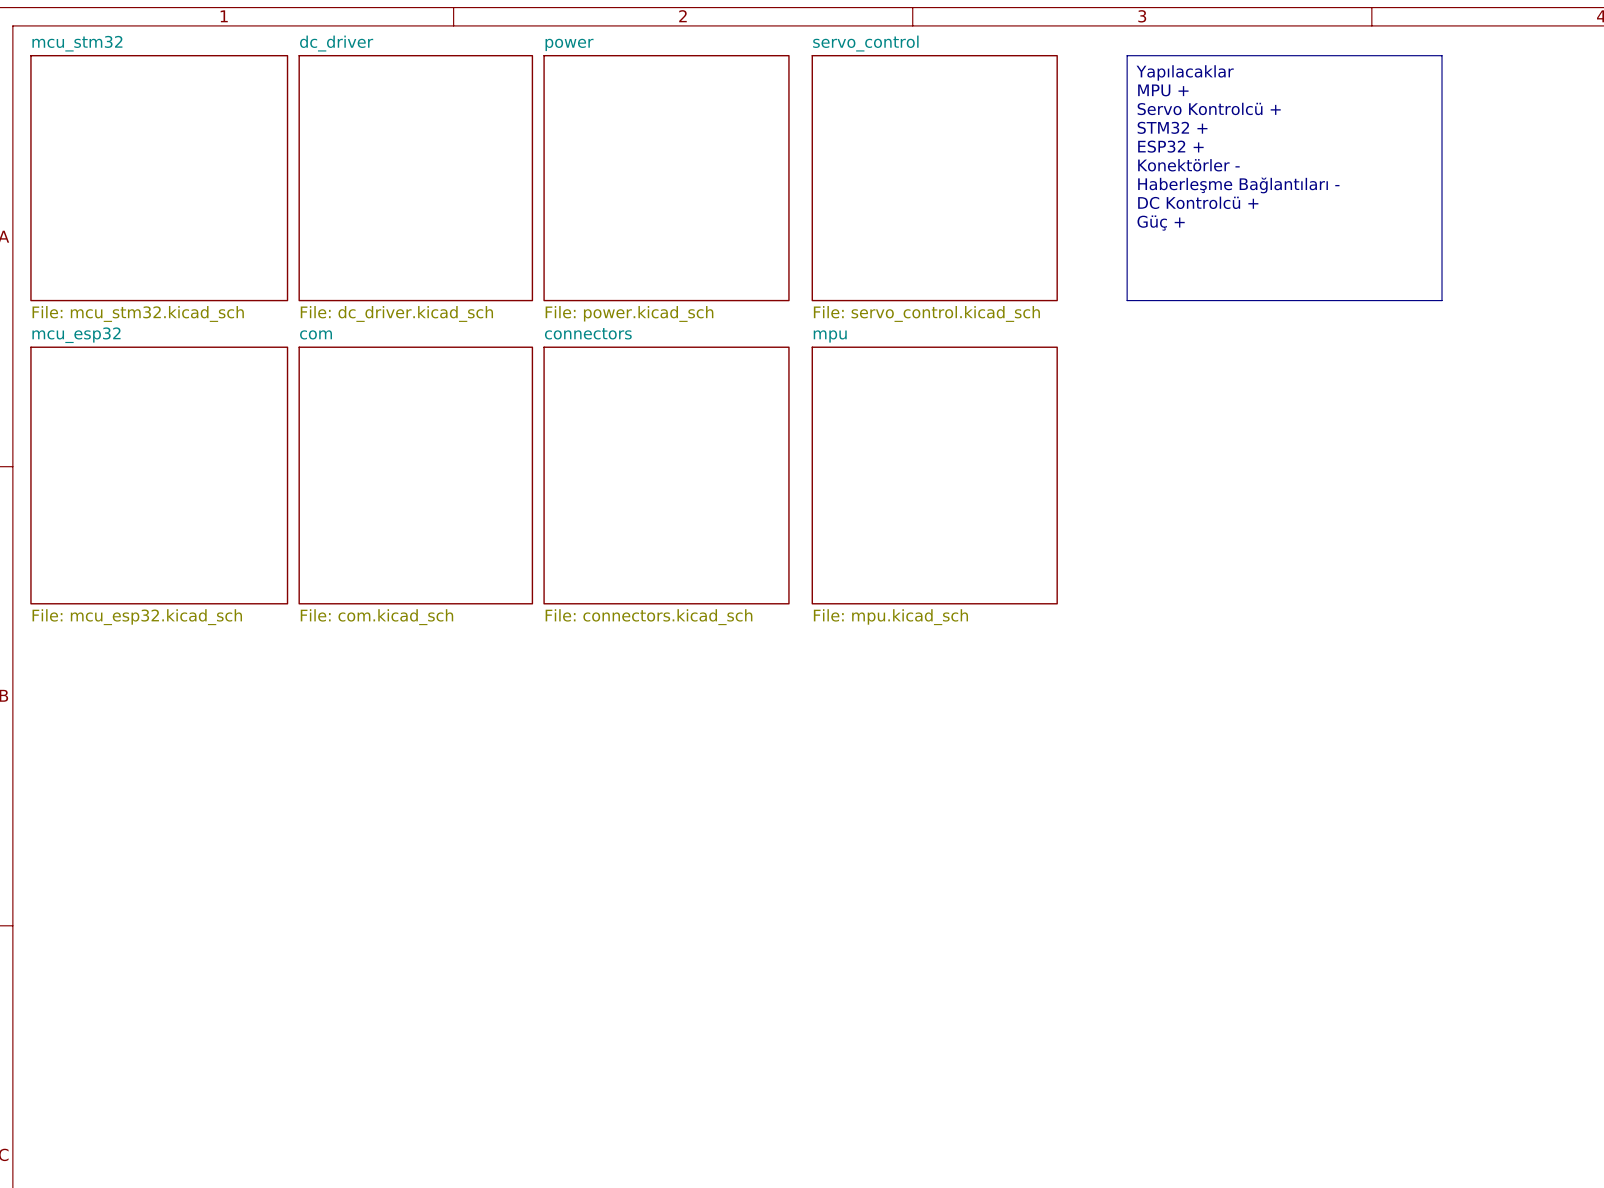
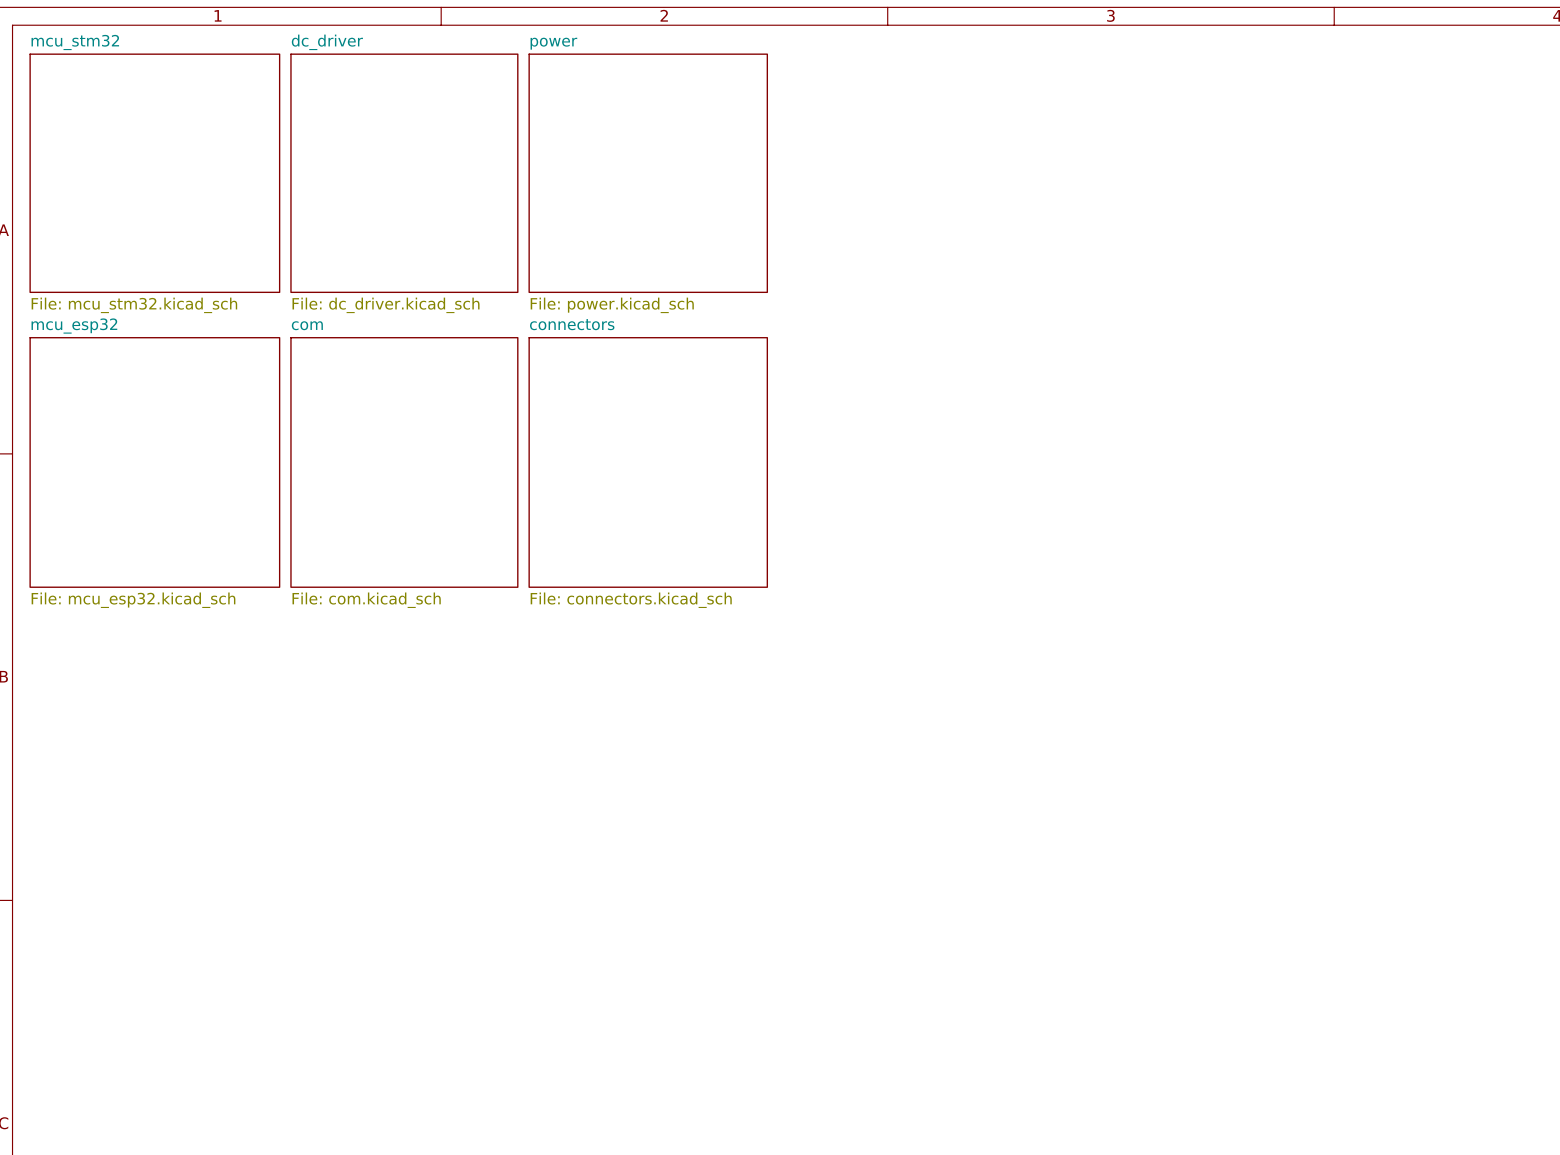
line: (1127, 55) (1442, 55) (1442, 300) (1127, 300) (1127, 55) -> none
text: Yapılacaklar (1185, 72) -> none
text: MPU + (1163, 90) -> none
text: Servo Kontrolcü + (1209, 108) -> none
text: STM32 + (1172, 127) -> none
text: ESP32 + (1170, 146) -> none
text: Konektörler - (1188, 165) -> none
sheet servo_control: File: servo_control.kicad_sch (934, 178) -> none
text: Haberleşme Bağlantıları - (1238, 185) -> none
text: DC Kontrolcü + (1198, 202) -> none
text: Güç + (1161, 223) -> none
sheet mpu: File: mpu.kicad_sch (934, 475) -> none

